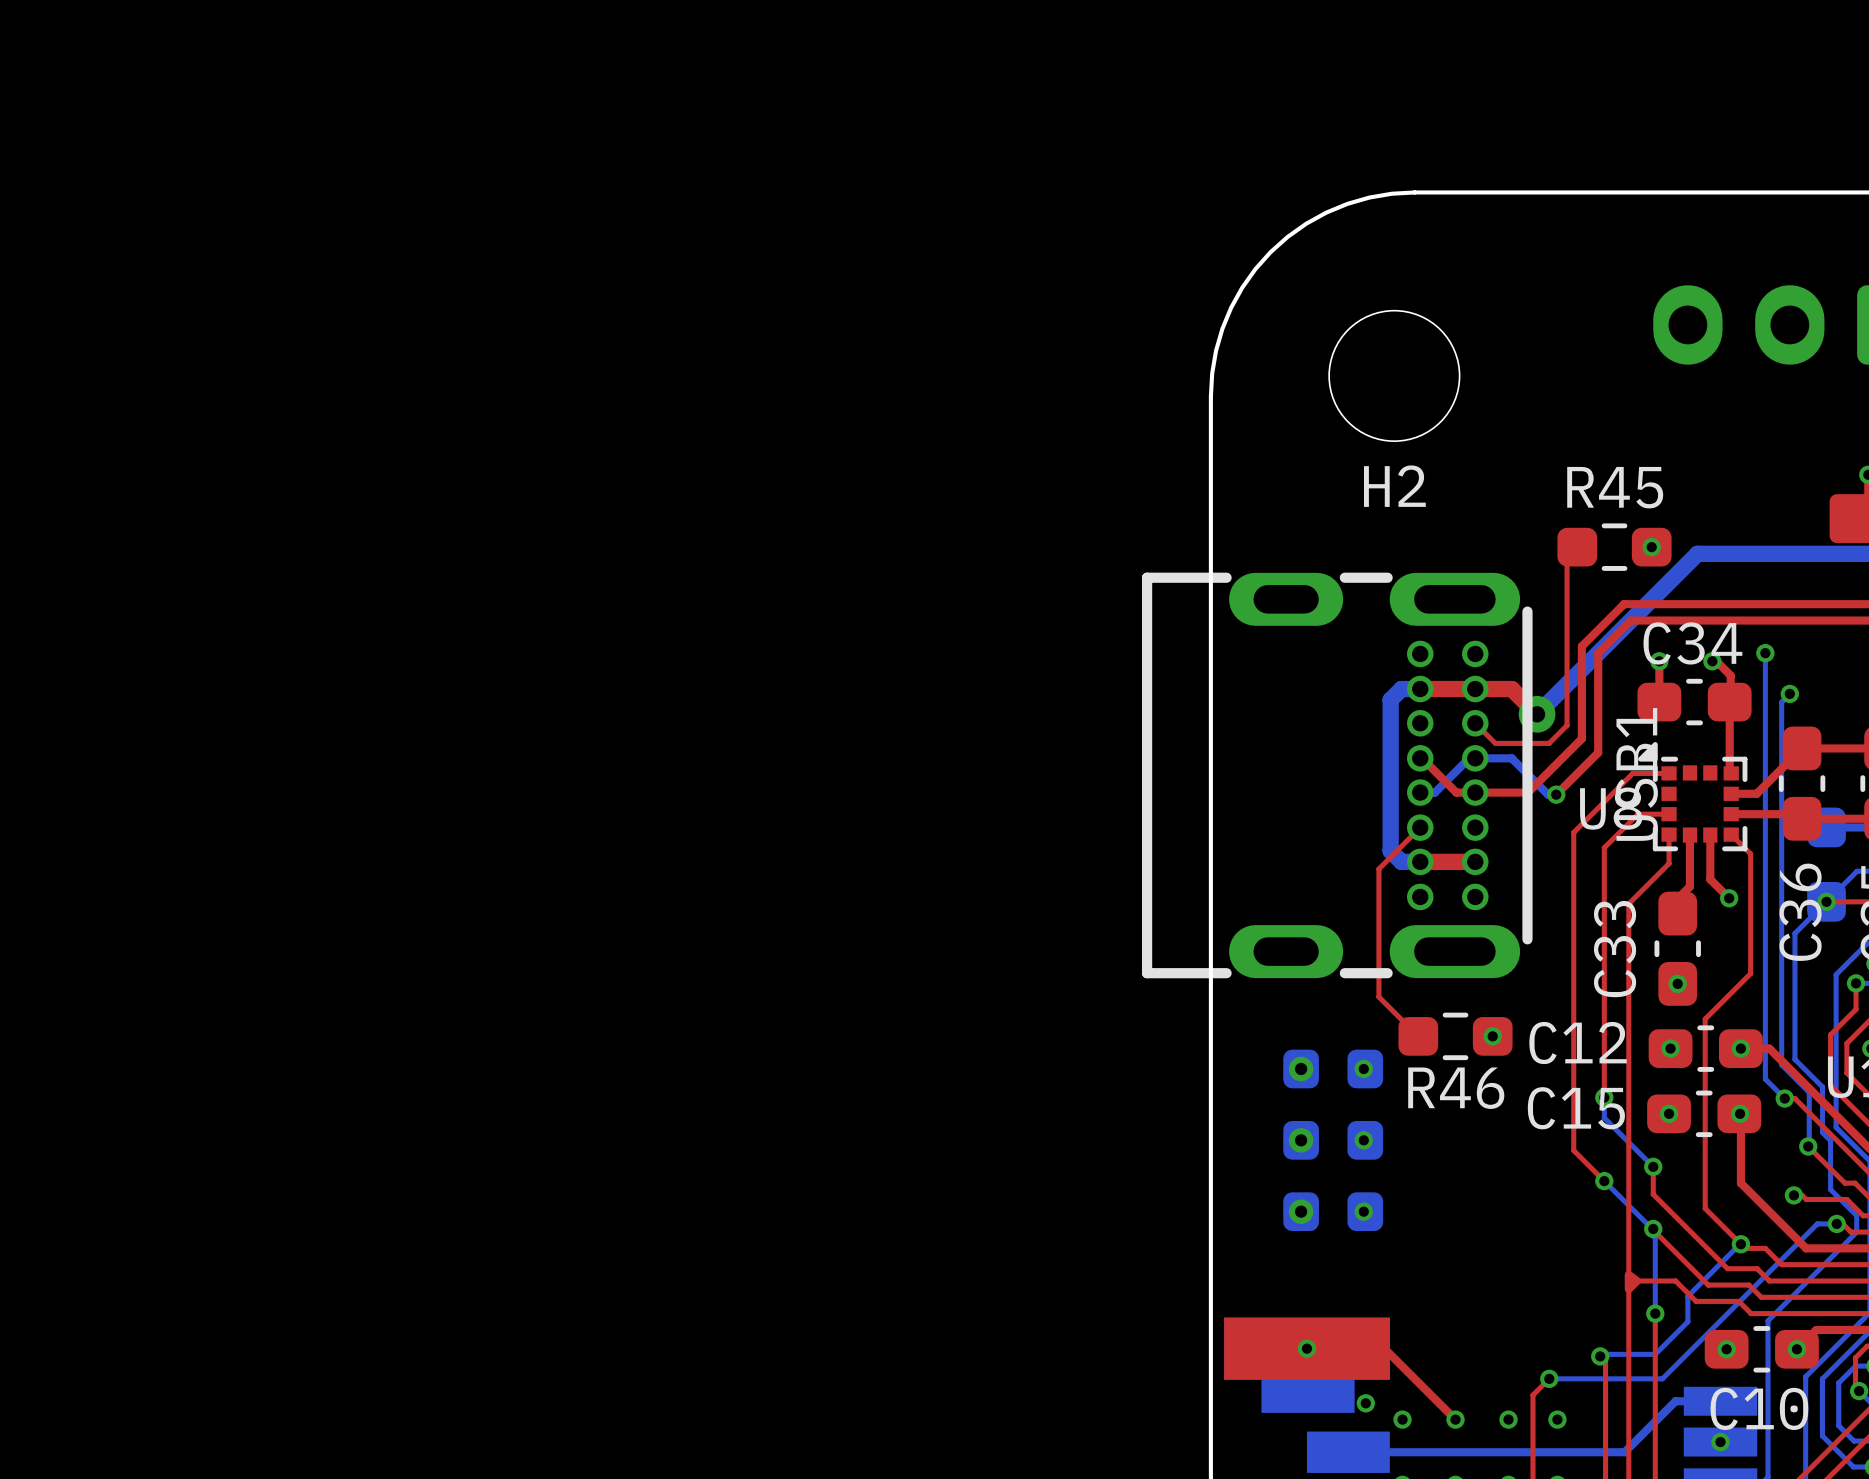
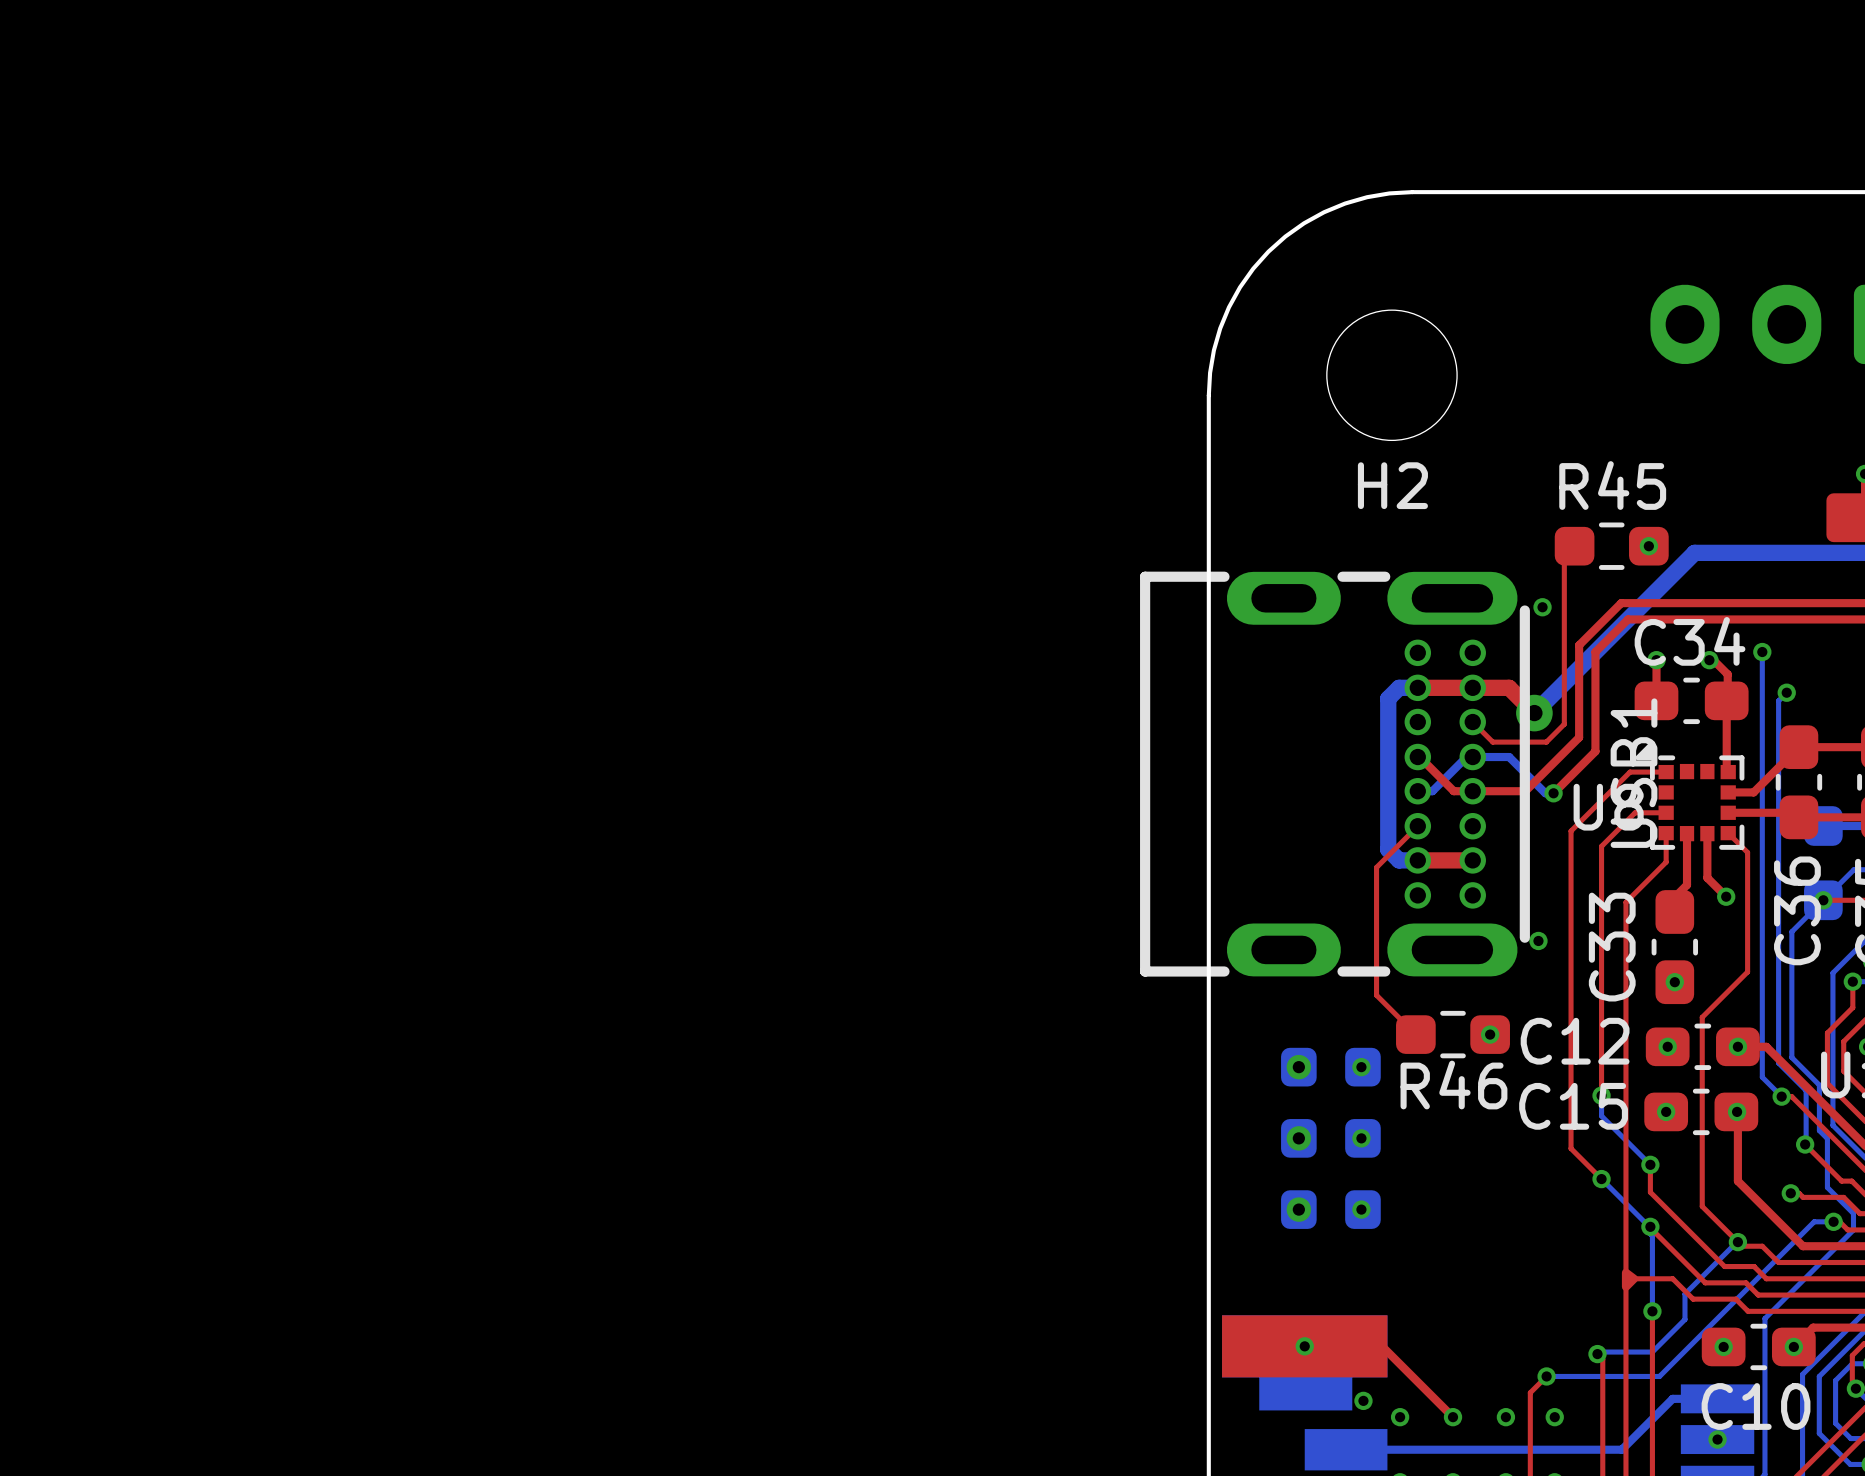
via: none -> (1542, 607)
via: none -> (1538, 940)

